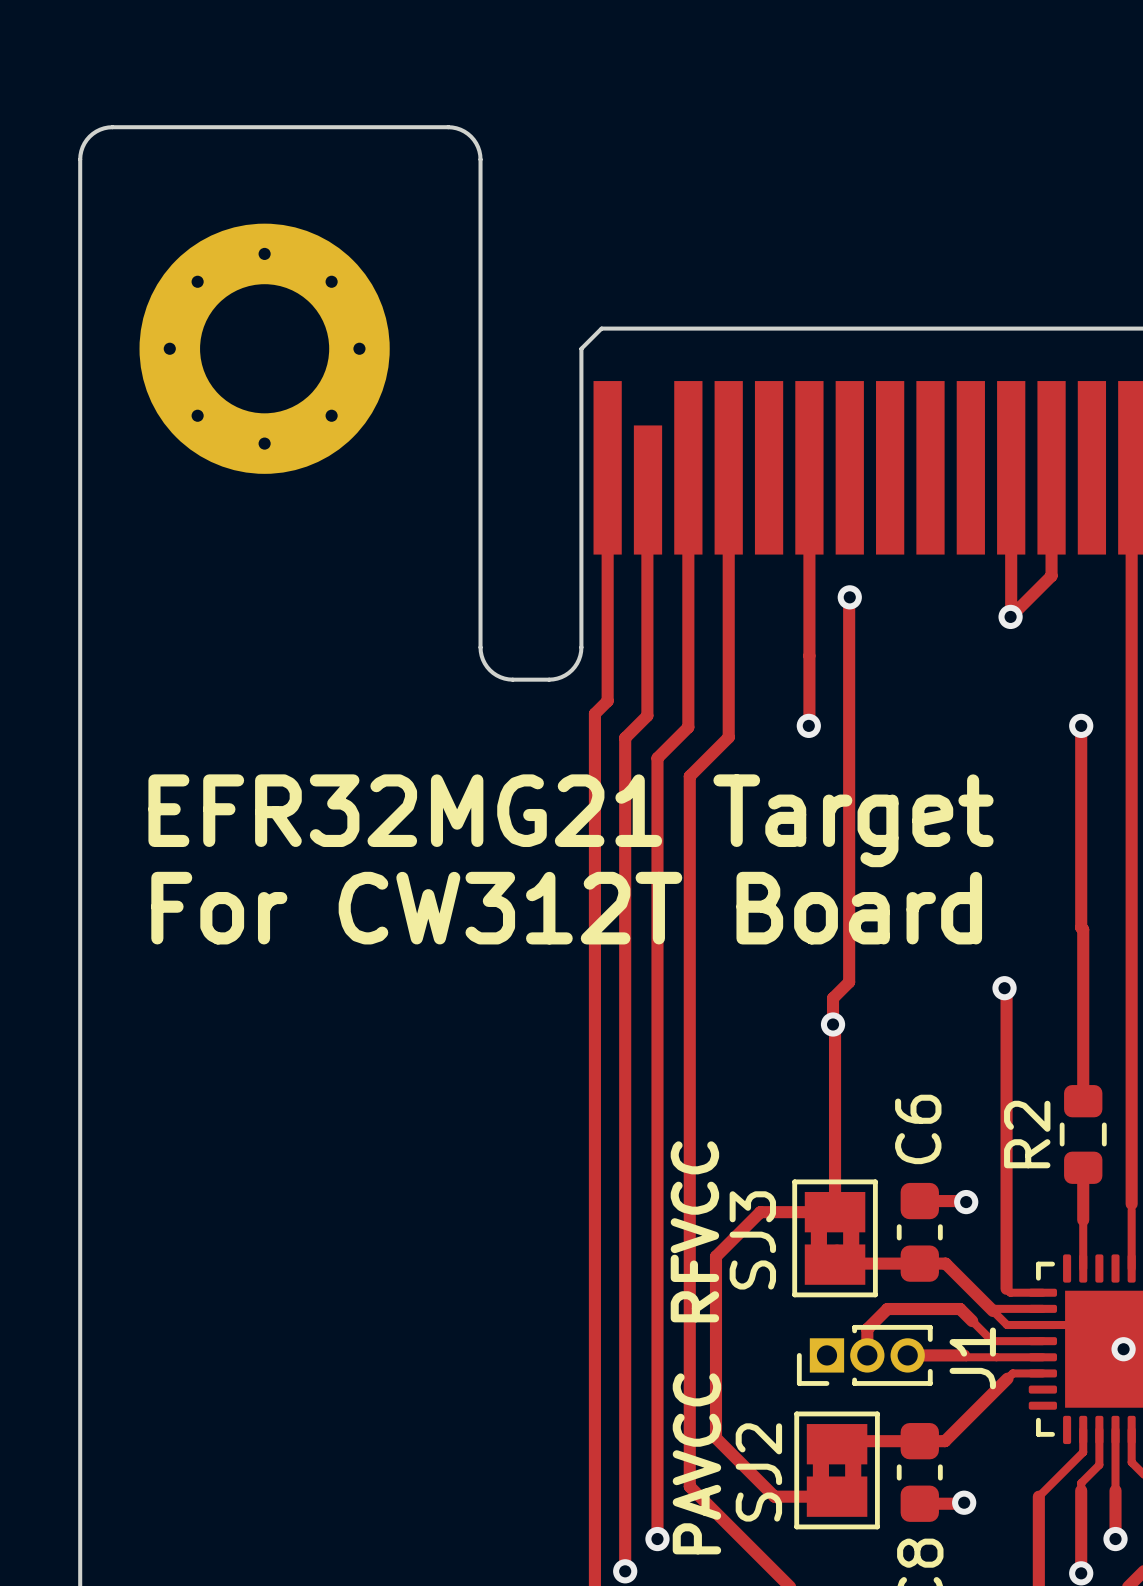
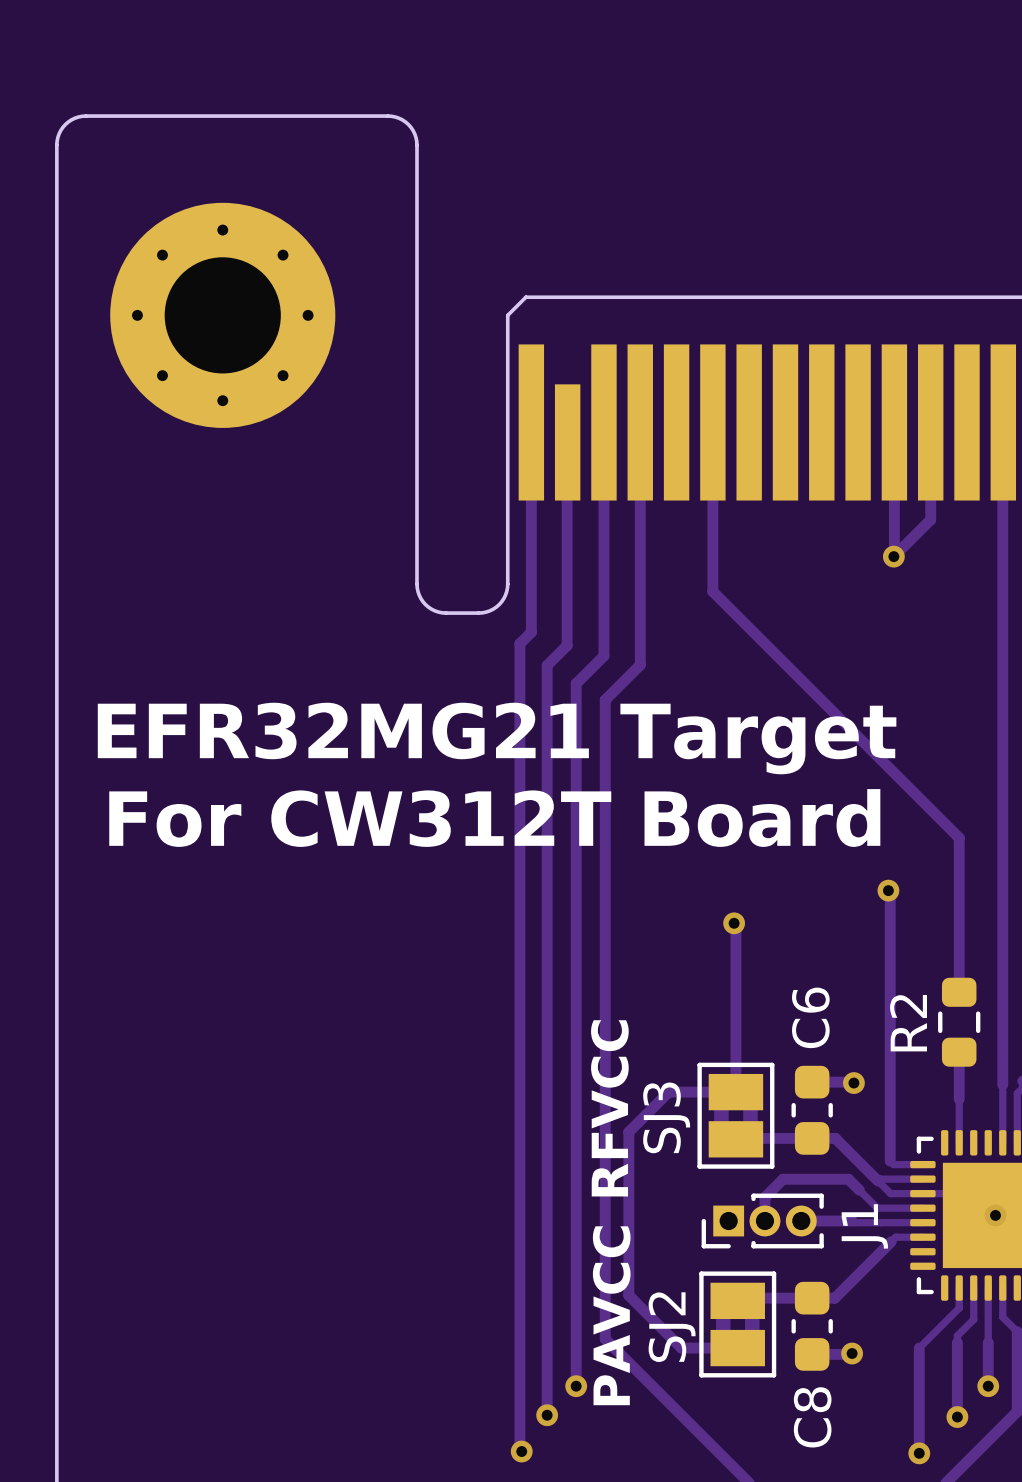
track: (849, 597) (849, 982) (833, 998) (833, 1024) -> none
via: (849, 597) -> none
track: (809, 655) (808, 725) -> none
via: (808, 725) -> none
track: (1081, 725) (1081, 927) -> (712, 591) (957, 836)
via: (1081, 725) -> none

